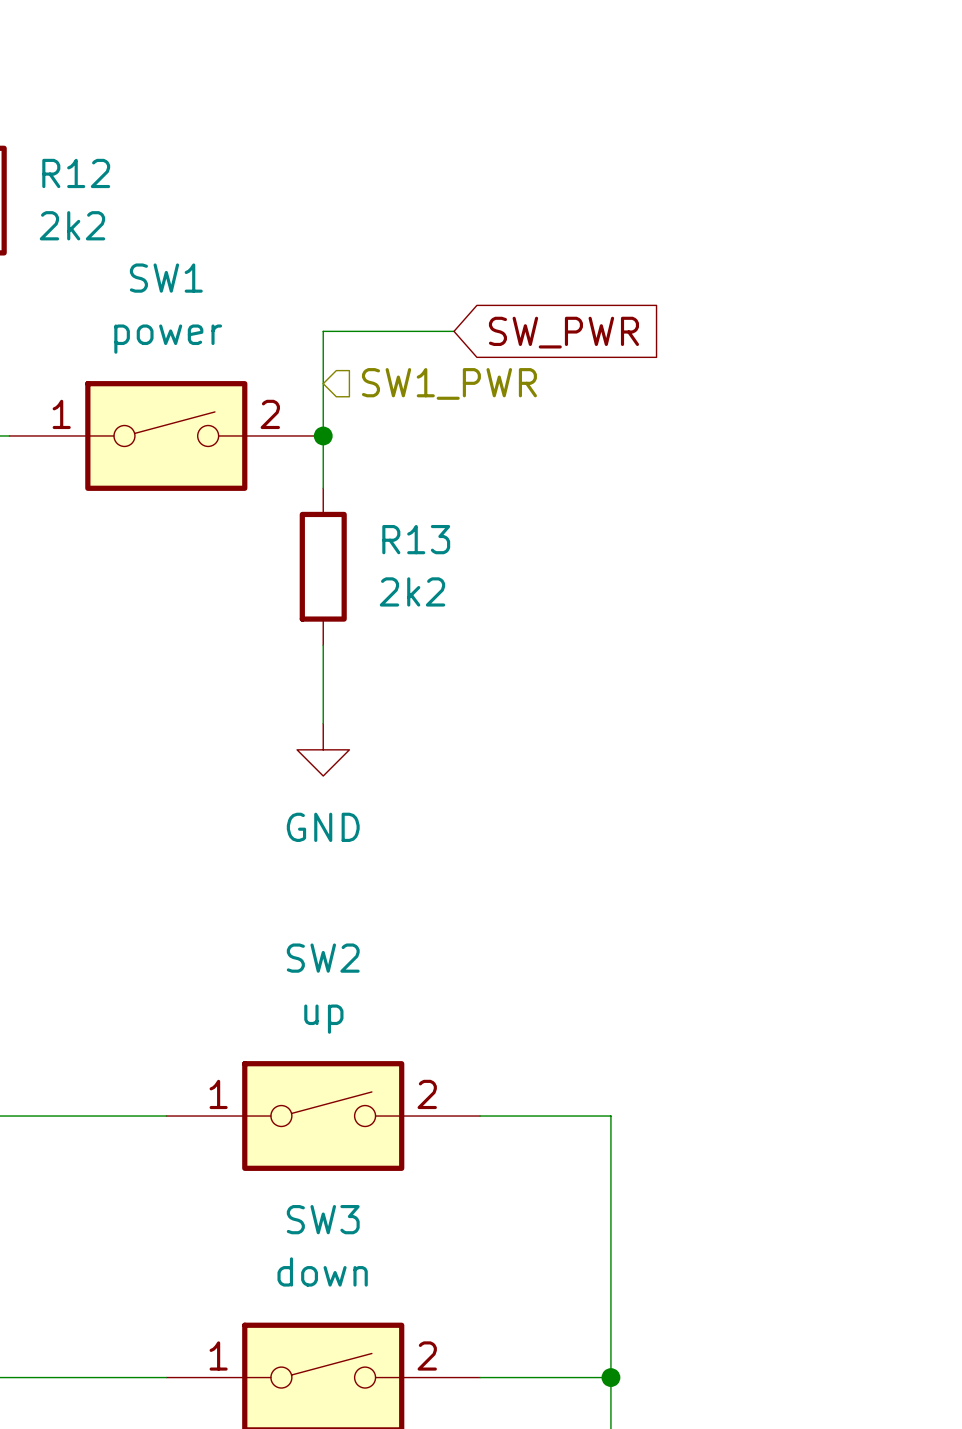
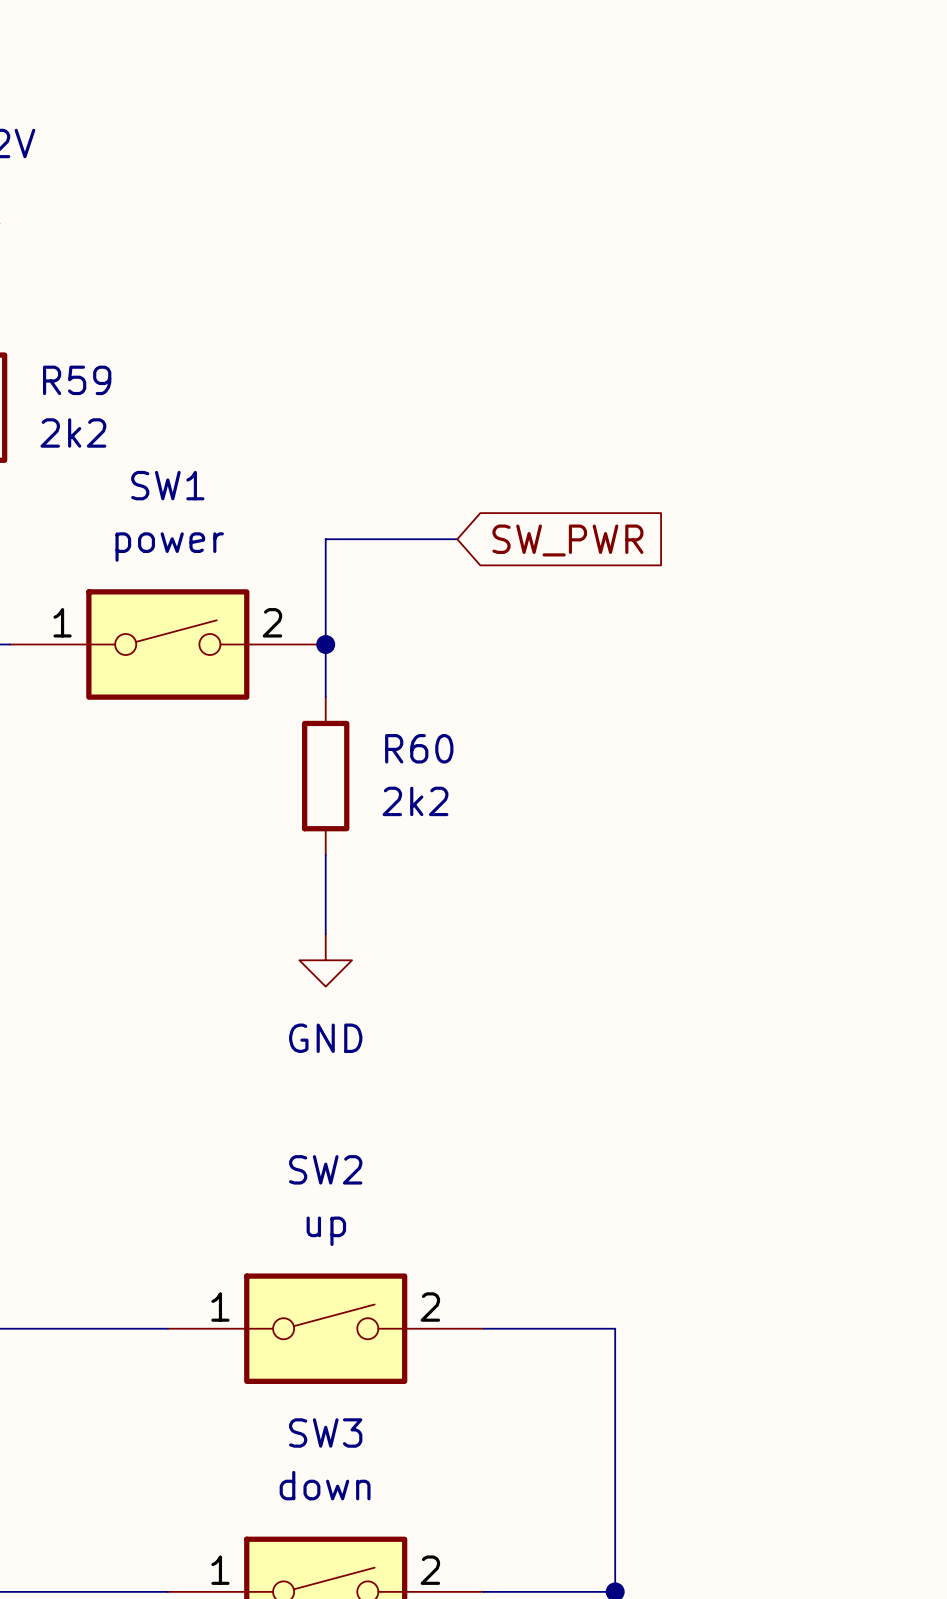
R12 name: R12 (76, 173) -> R59 (77, 380)
hierarchical label: SW1_PWR (449, 383) -> none
R13 name: R13 (416, 539) -> R60 (419, 748)

